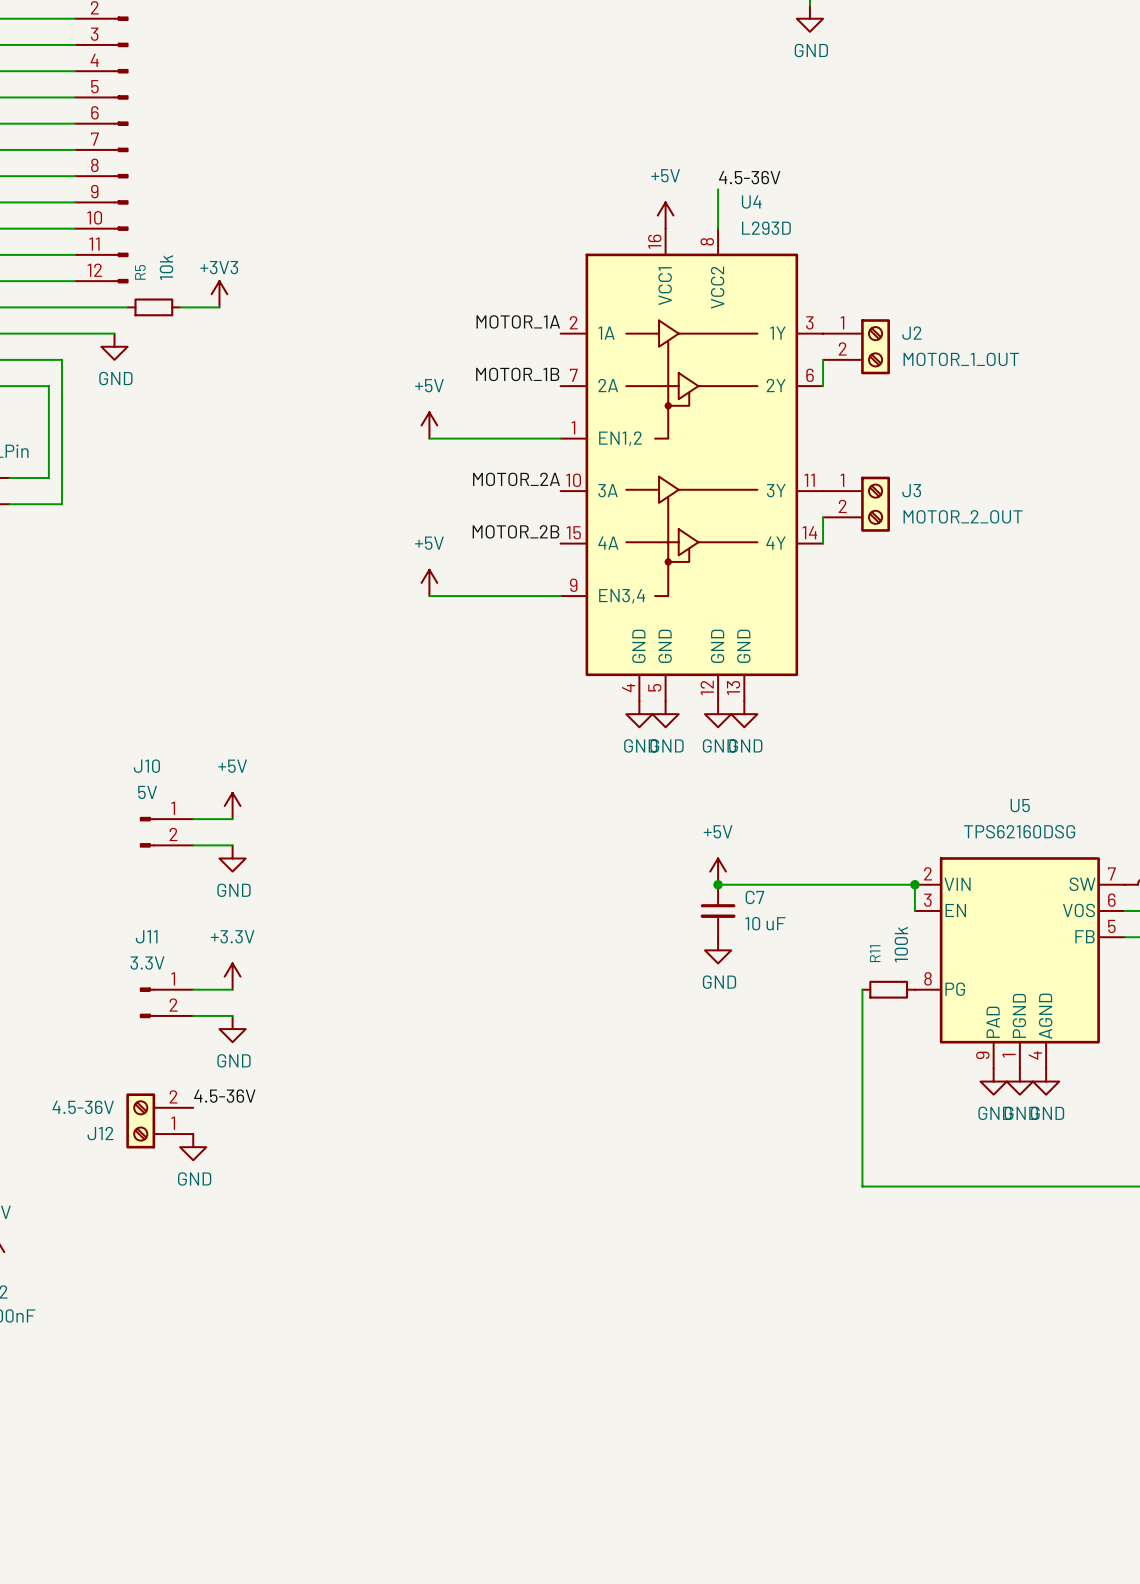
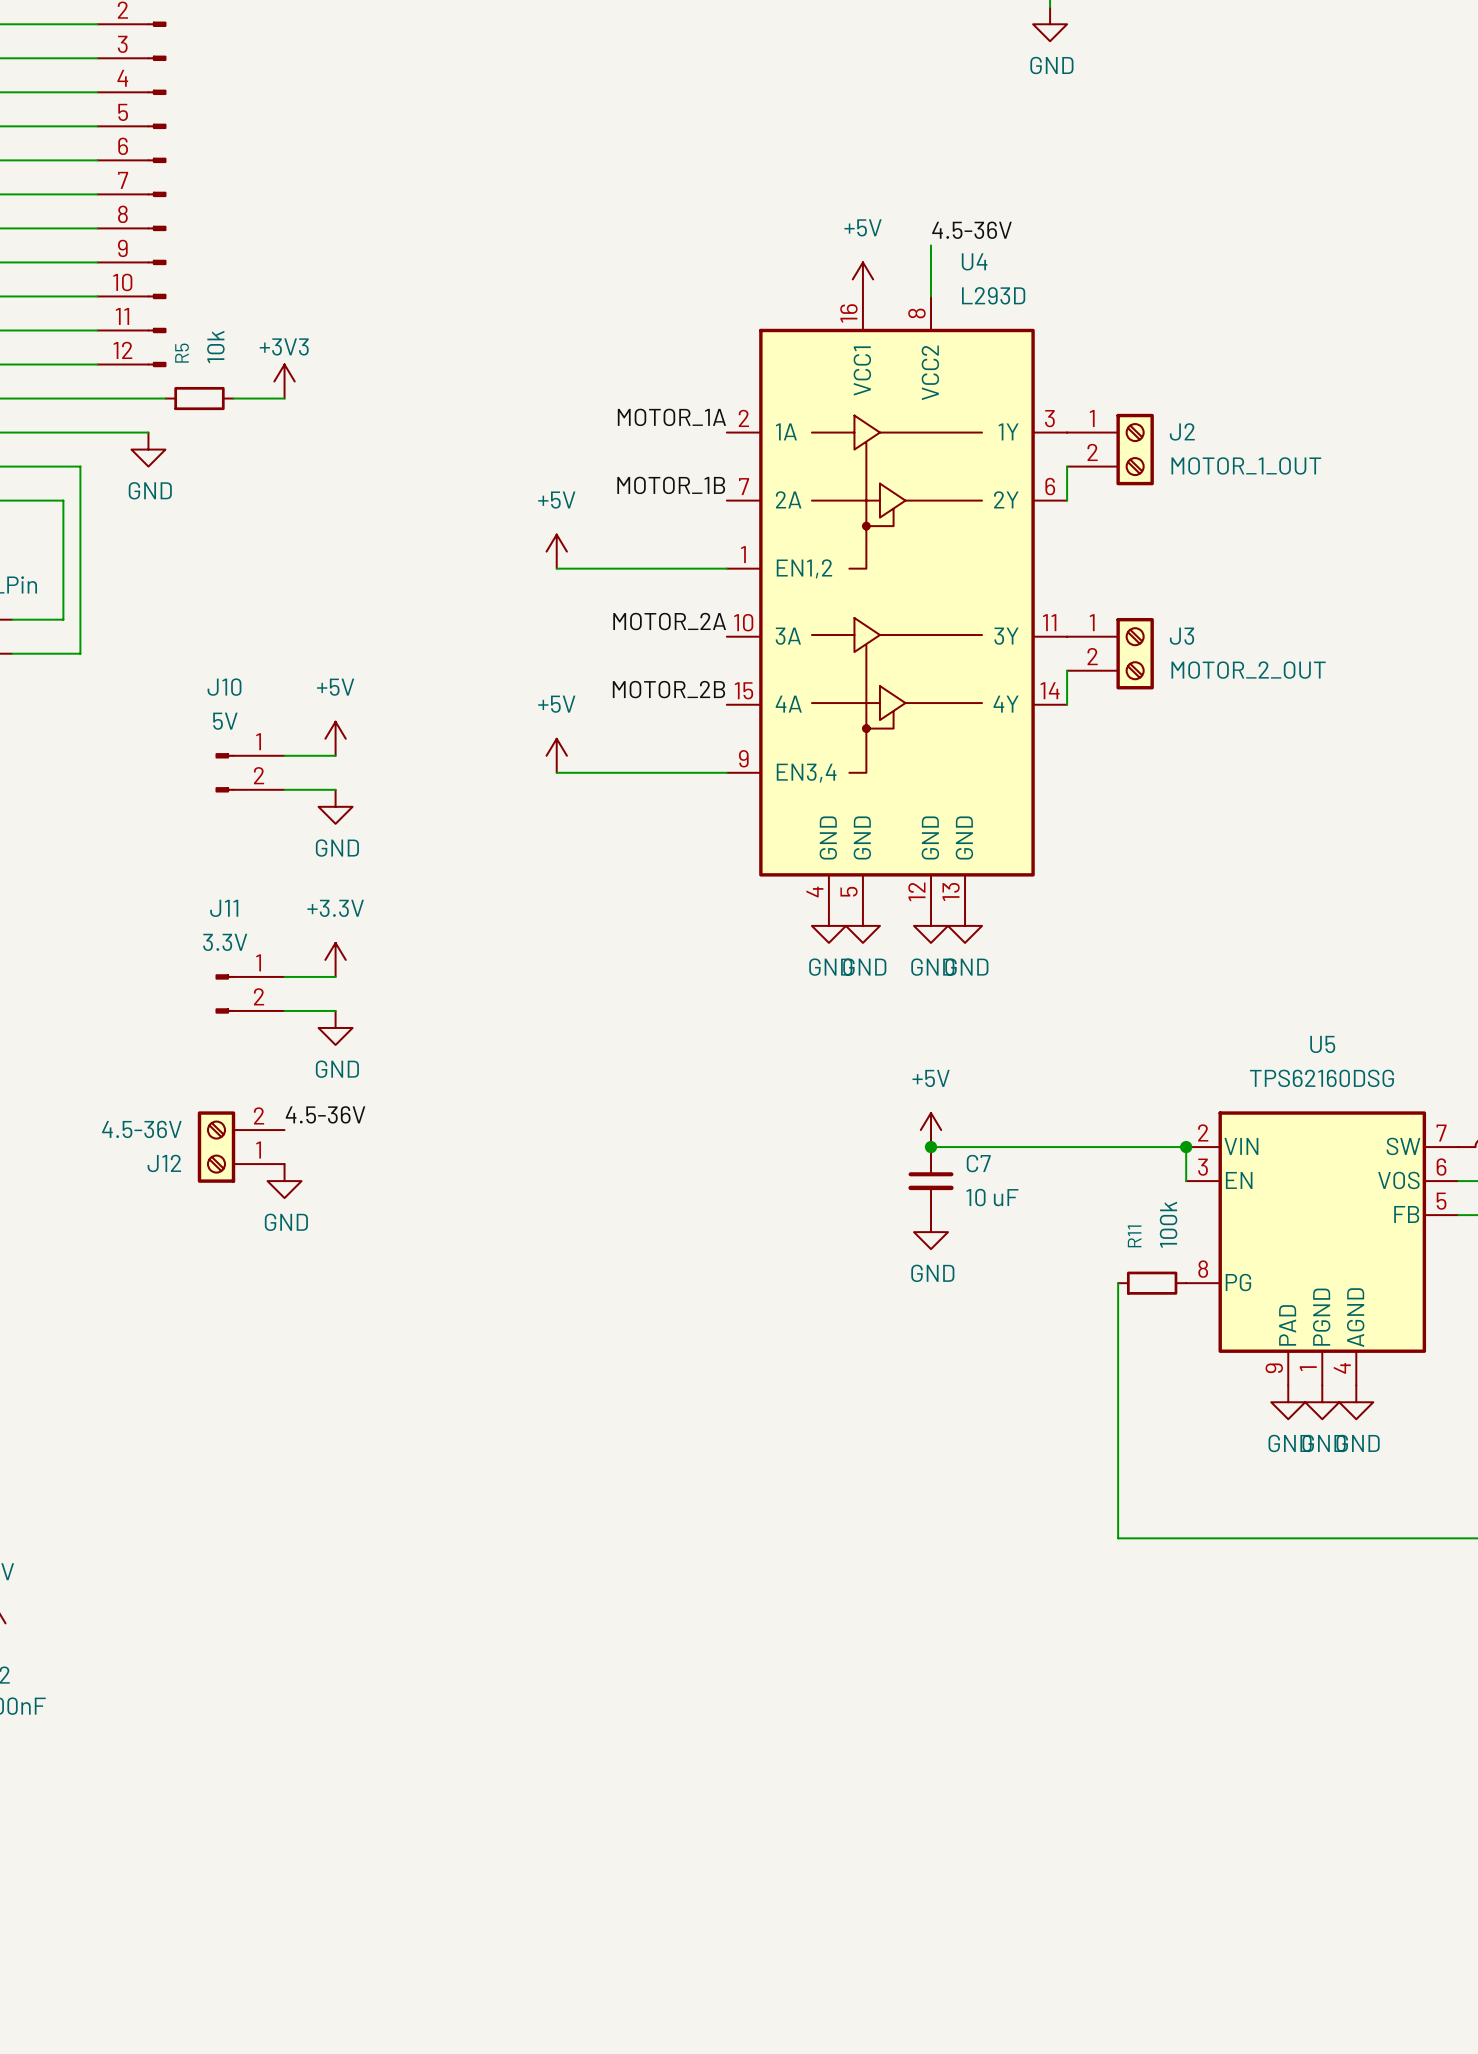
power symbol: none -> GND (335, 806)
power symbol: none -> GND (335, 1027)
power symbol position: +5V (232, 806) -> +5V (335, 738)
wire: (193, 819) (232, 819) -> (284, 755) (335, 755)
J10 position: (166, 832) -> (250, 772)
wire: (193, 845) (232, 845) -> (284, 789) (335, 789)
power symbol: GND (232, 858) -> none
power symbol: none -> GND (284, 1181)
power symbol position: +3.3V (232, 976) -> +3.3V (335, 959)
wire: (193, 989) (232, 989) -> (284, 976) (335, 976)
J11 position: (166, 1002) -> (250, 993)
wire: (193, 1015) (232, 1015) -> (284, 1010) (335, 1010)
power symbol: GND (232, 1029) -> none
label position: 4.5-36V (224, 1096) -> 4.5-36V (325, 1114)
J12 position: (159, 1120) -> (241, 1147)
power symbol: GND (193, 1147) -> none

